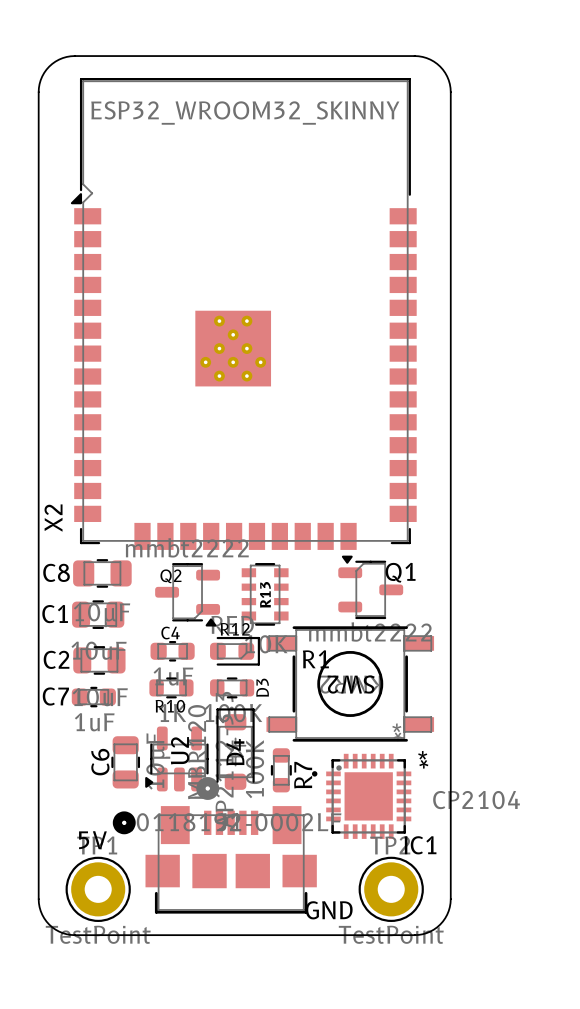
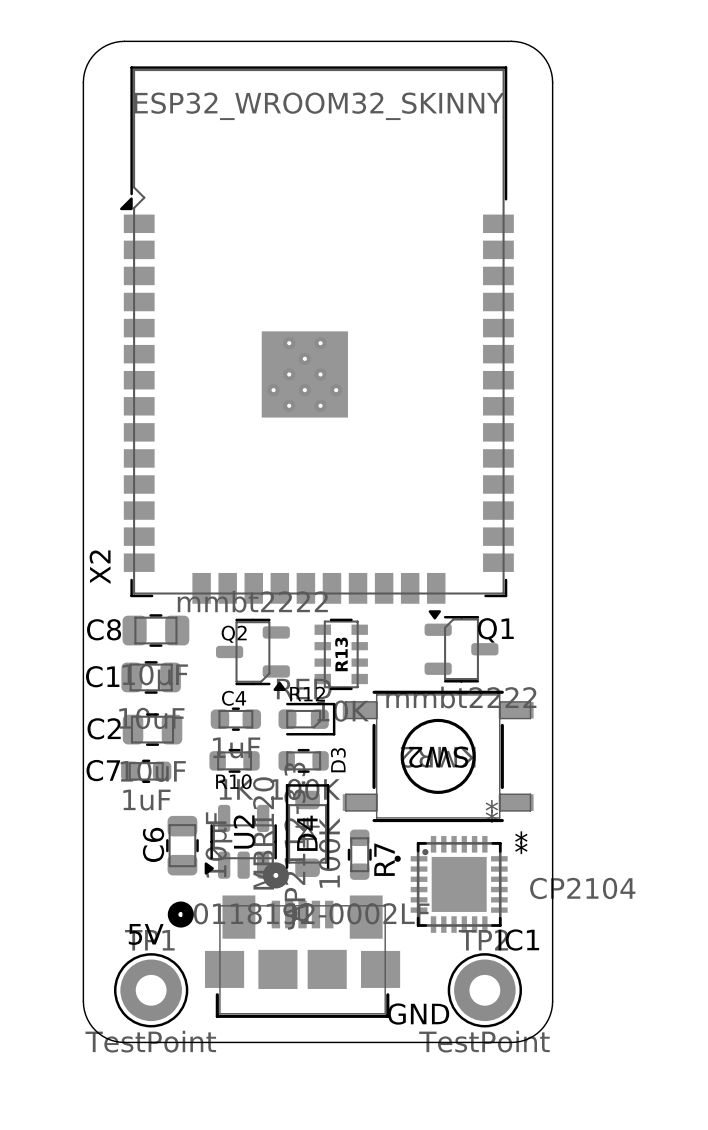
text: R1 (315, 659) -> none

